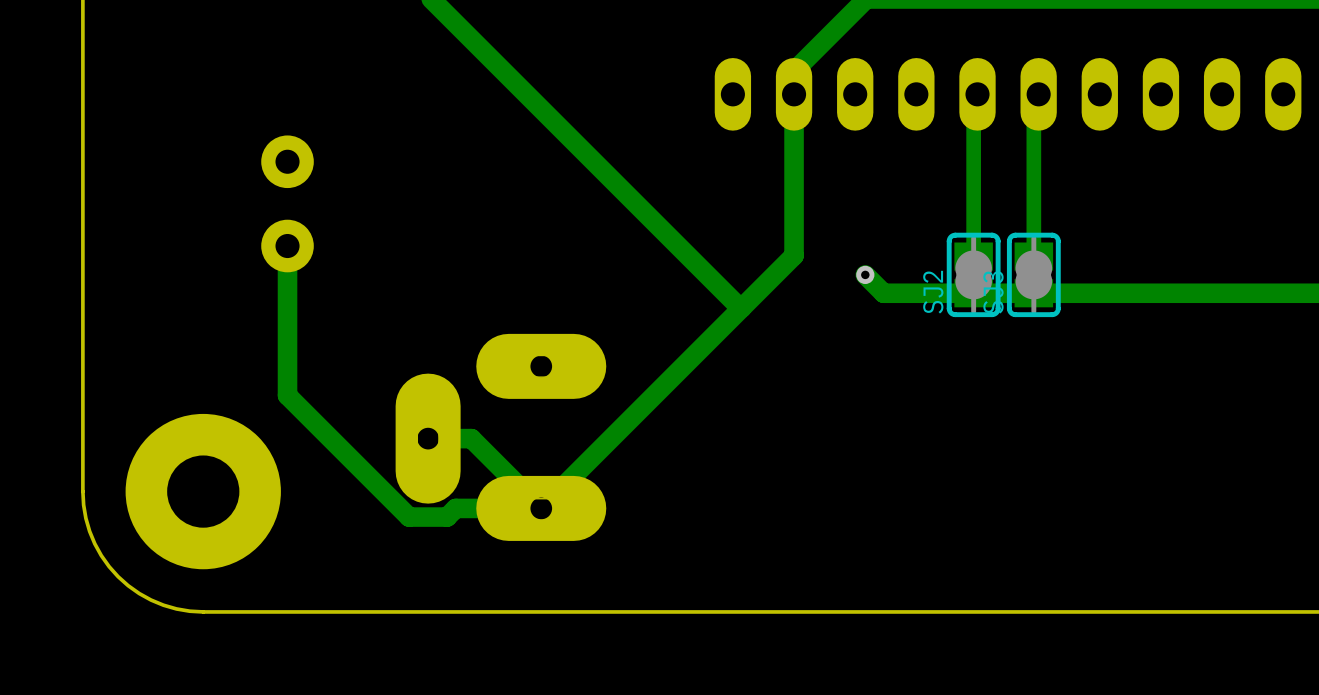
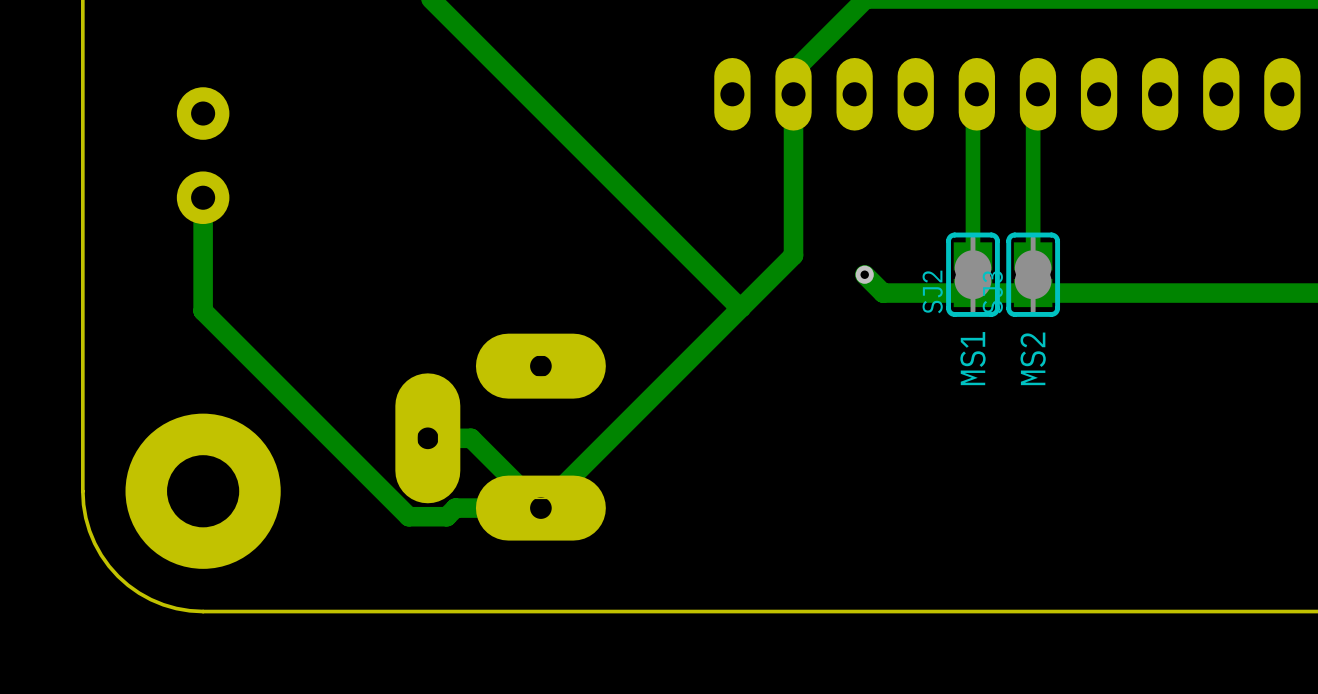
part position: (287, 203) -> (203, 155)
track: (287, 246) (287, 395) -> (203, 197) (203, 311) (287, 395)
text: none -> MS1 (972, 358)
text: none -> MS2 (1033, 358)

